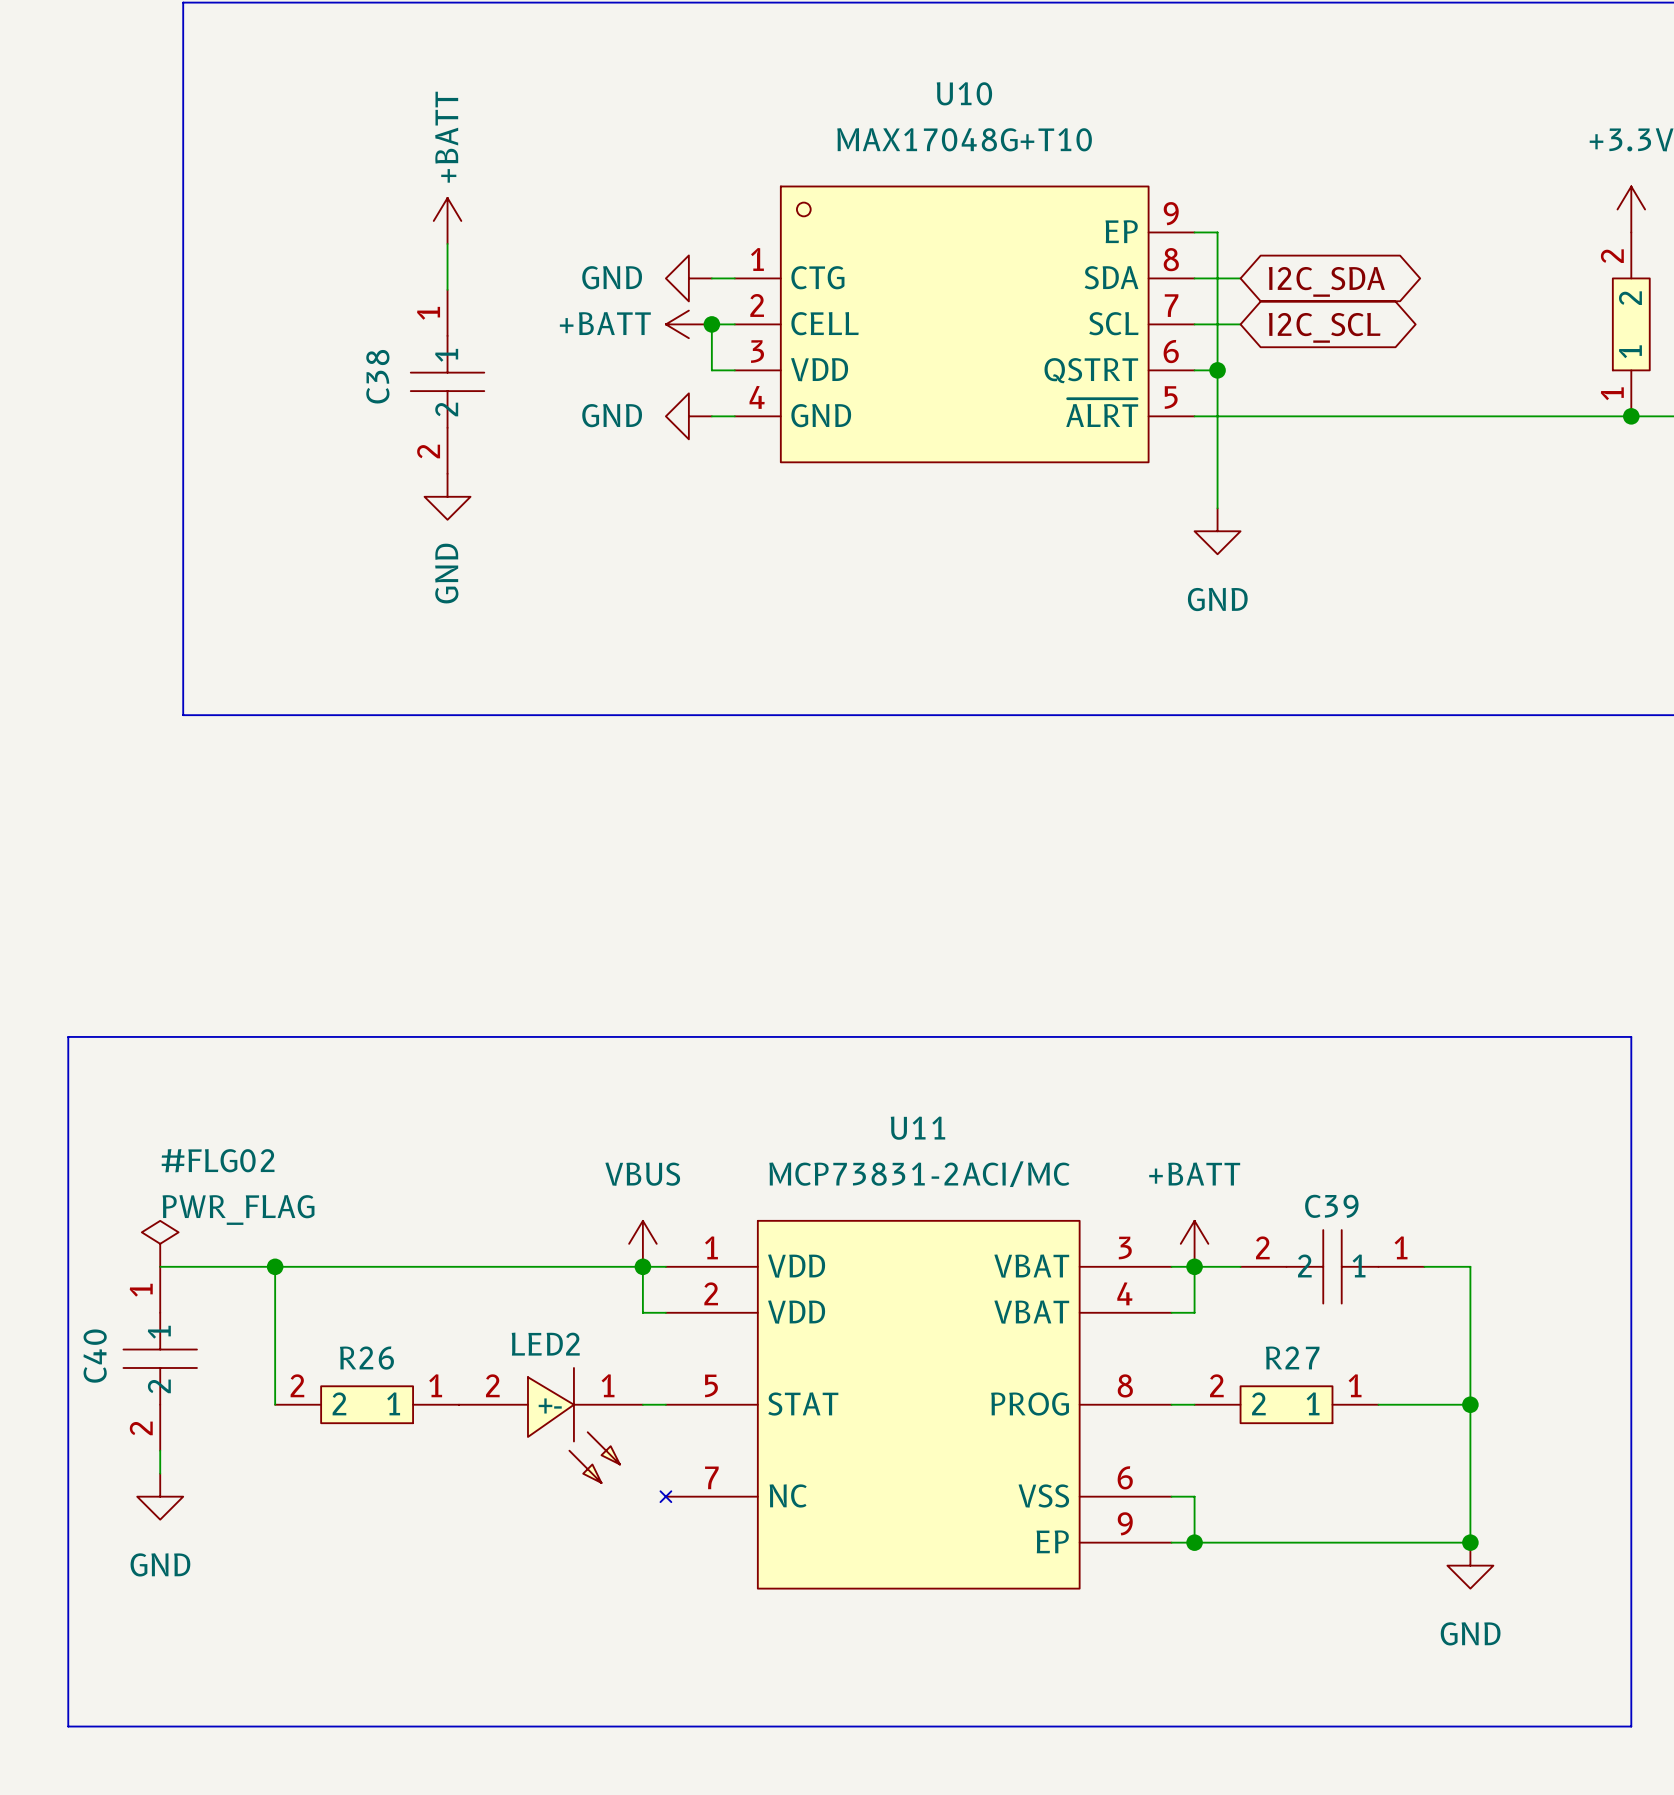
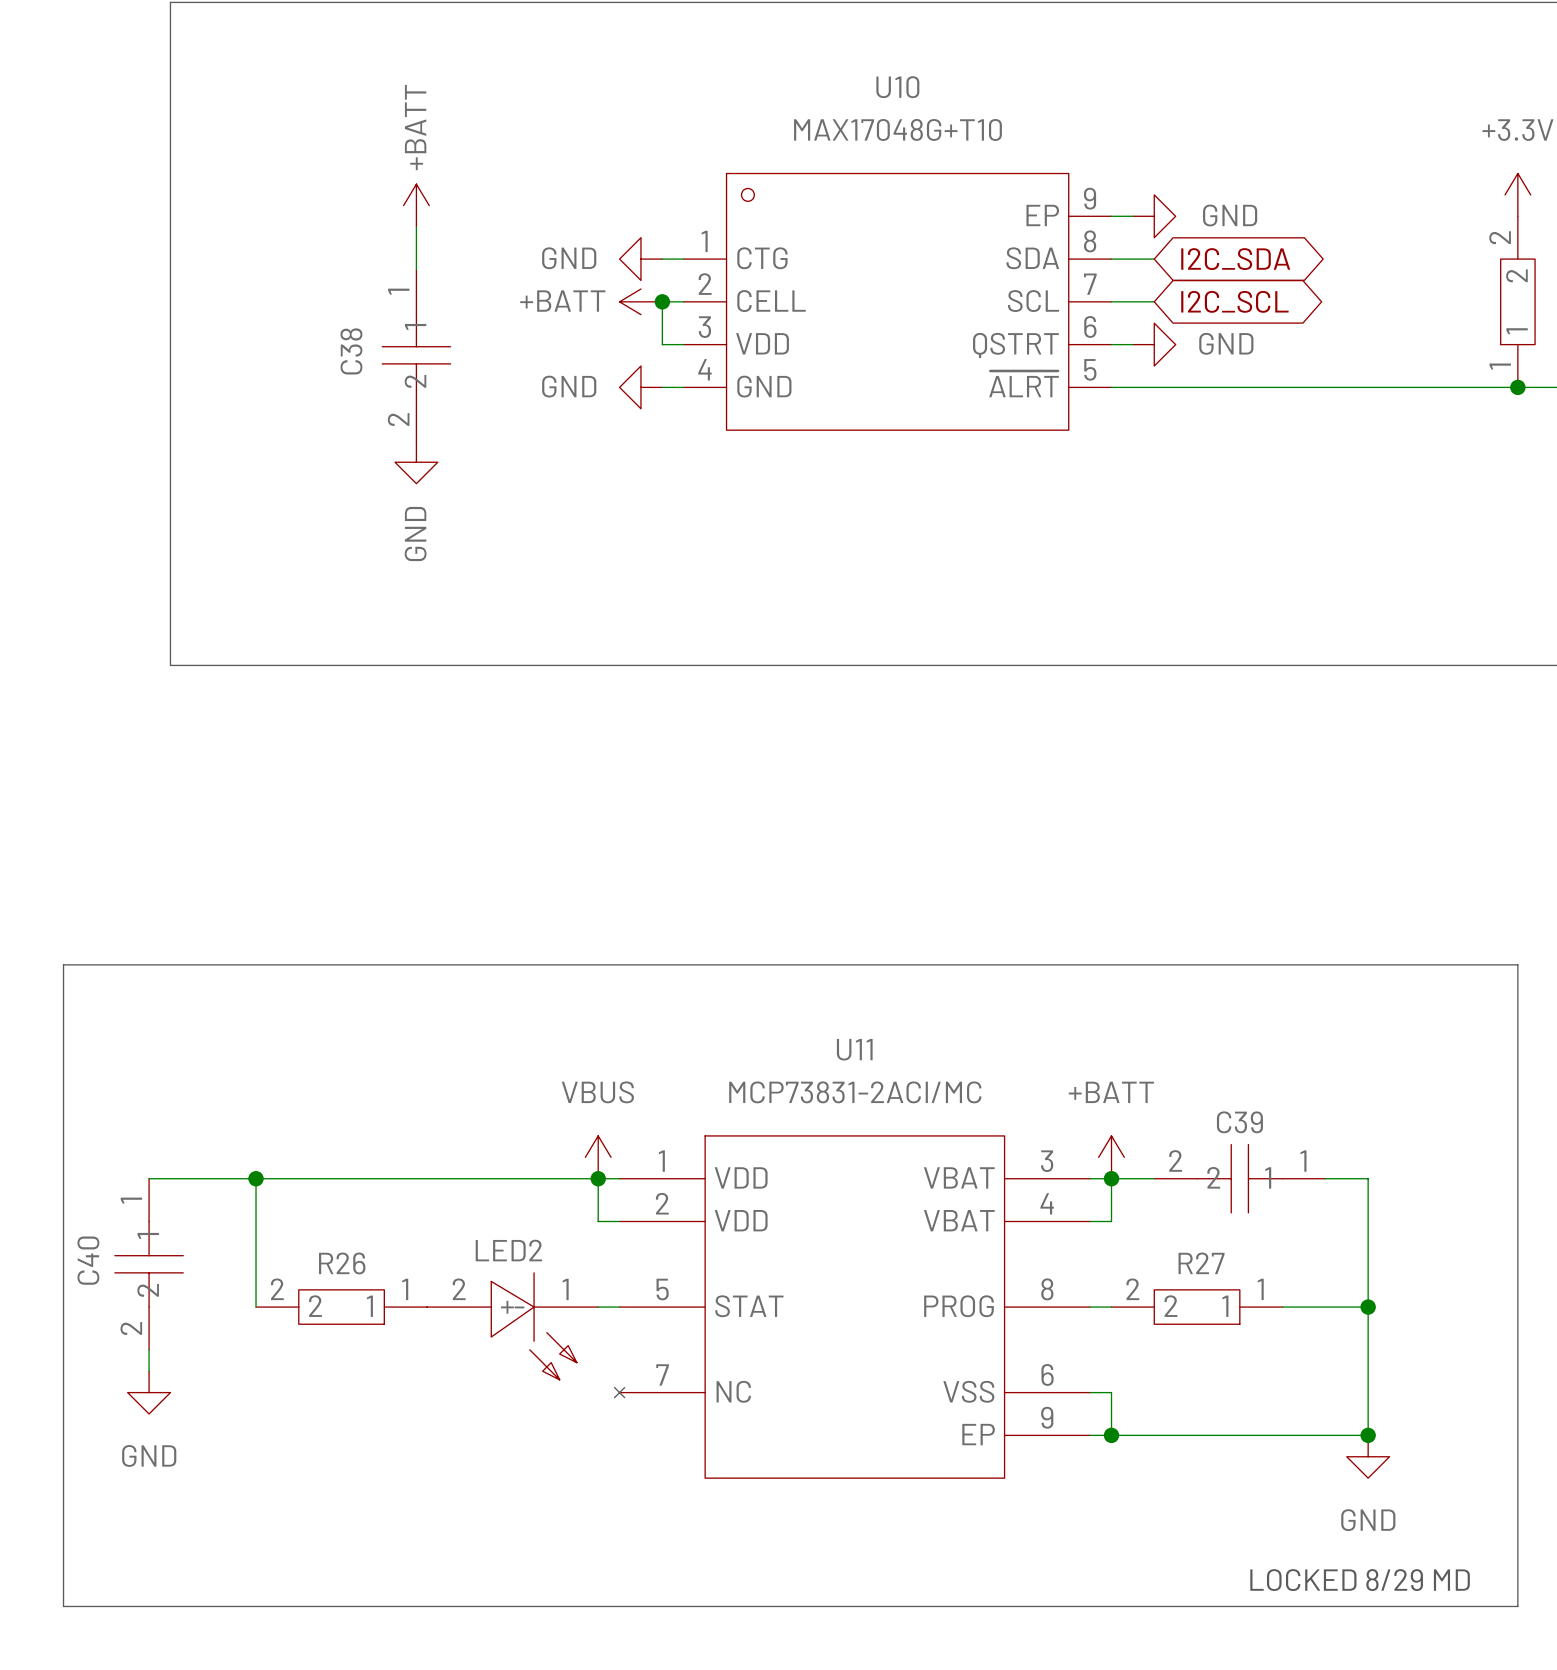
wire: (1217, 232) (1217, 508) -> none
power symbol: none -> GND (1154, 216)
junction: (1217, 370) -> none
power symbol: none -> GND (1154, 344)
power symbol: GND (1217, 531) -> none
#FLG02: PWR_FLAG (160, 1243) -> none
text: none -> LOCKED 8/29 MD (1360, 1580)

